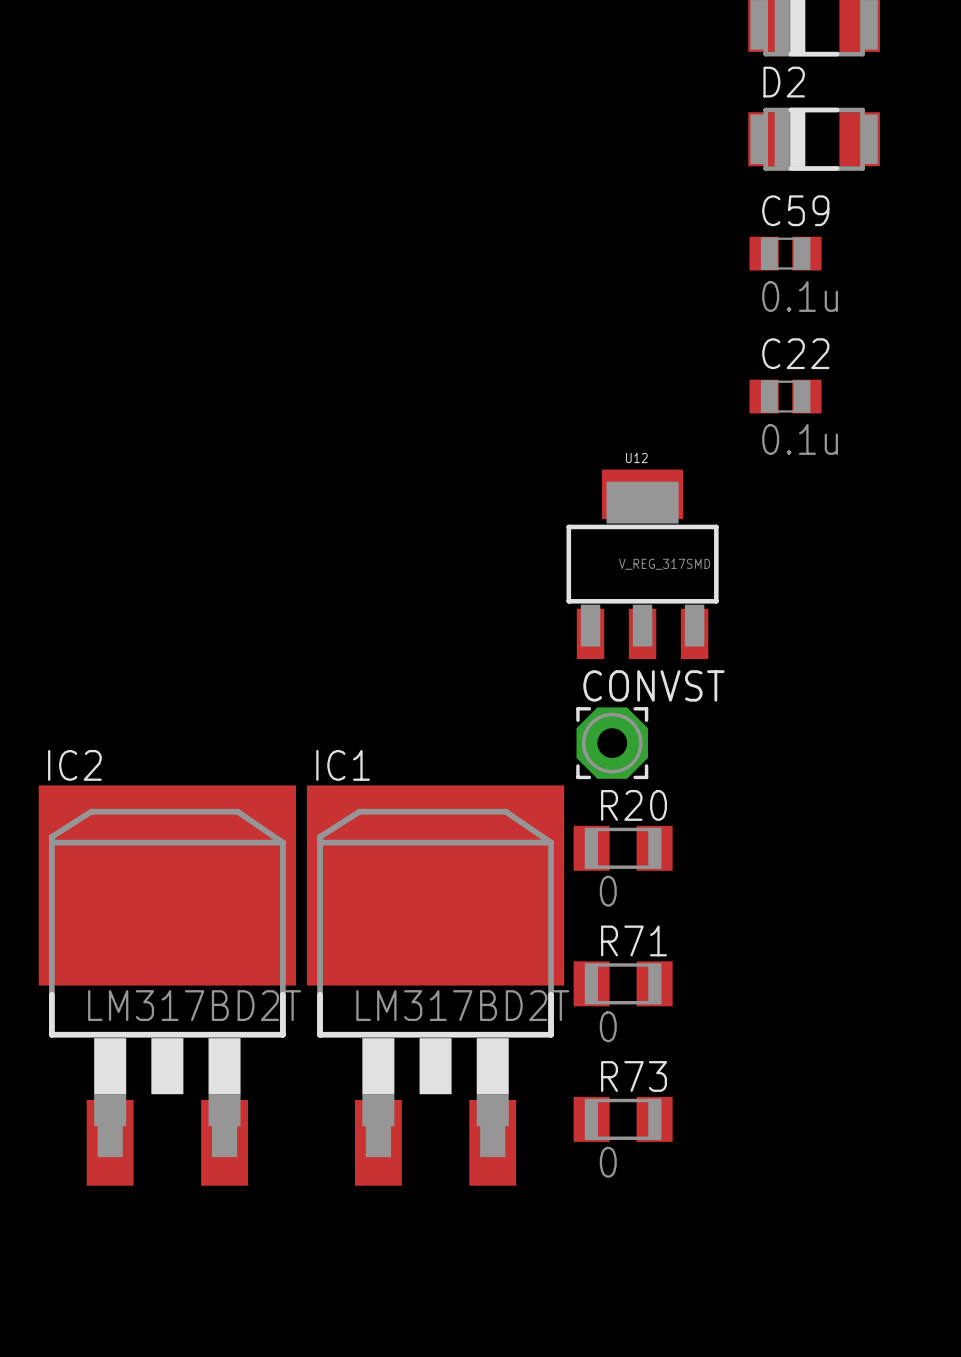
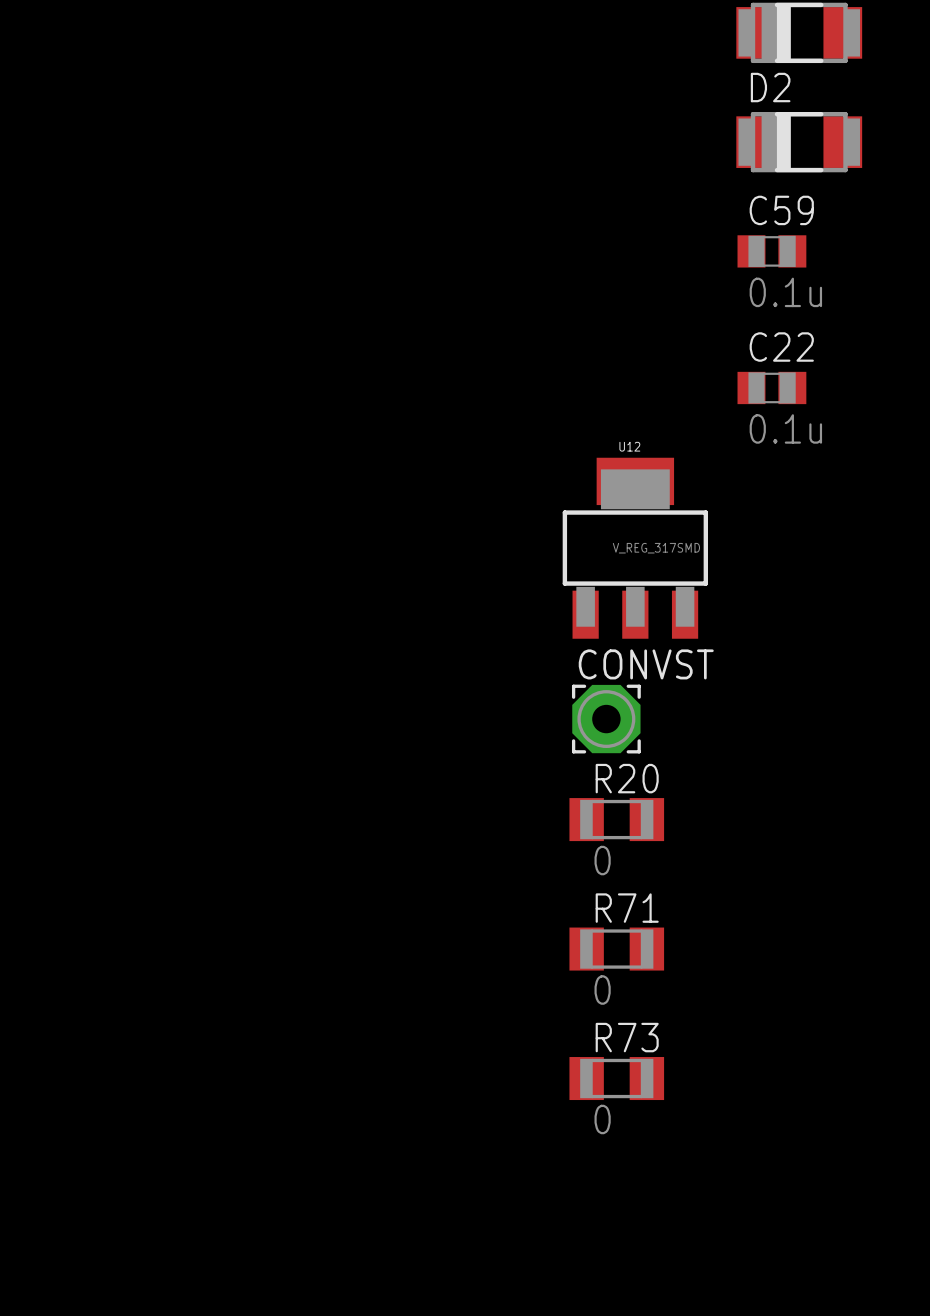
IC2: LM317BD2T (167, 985) -> none
IC1: LM317BD2T (435, 985) -> none

